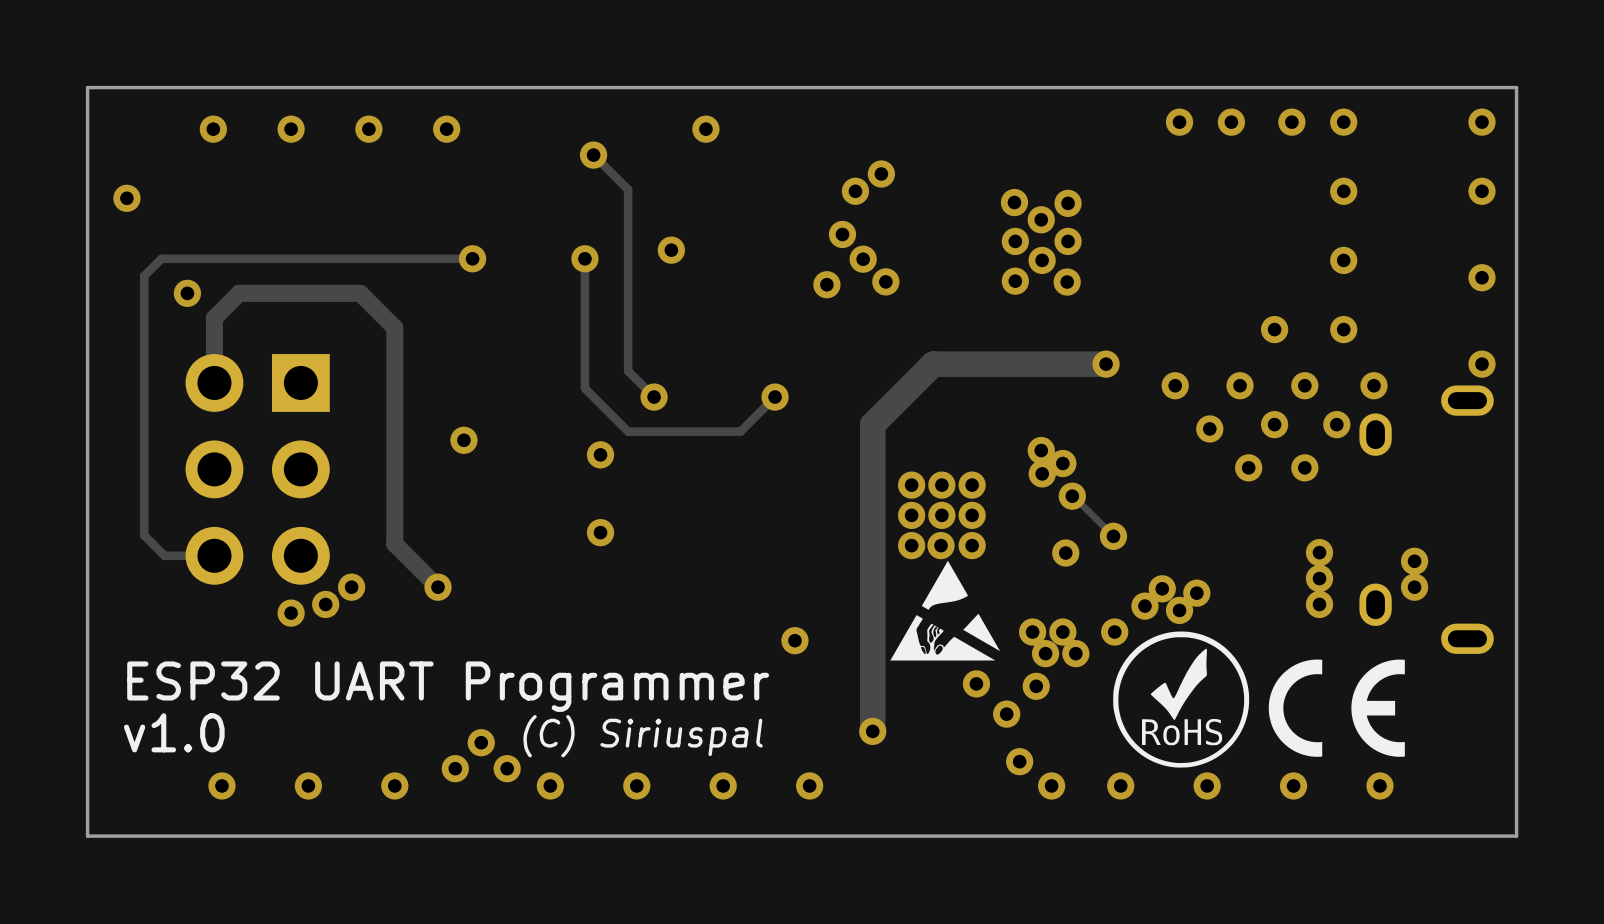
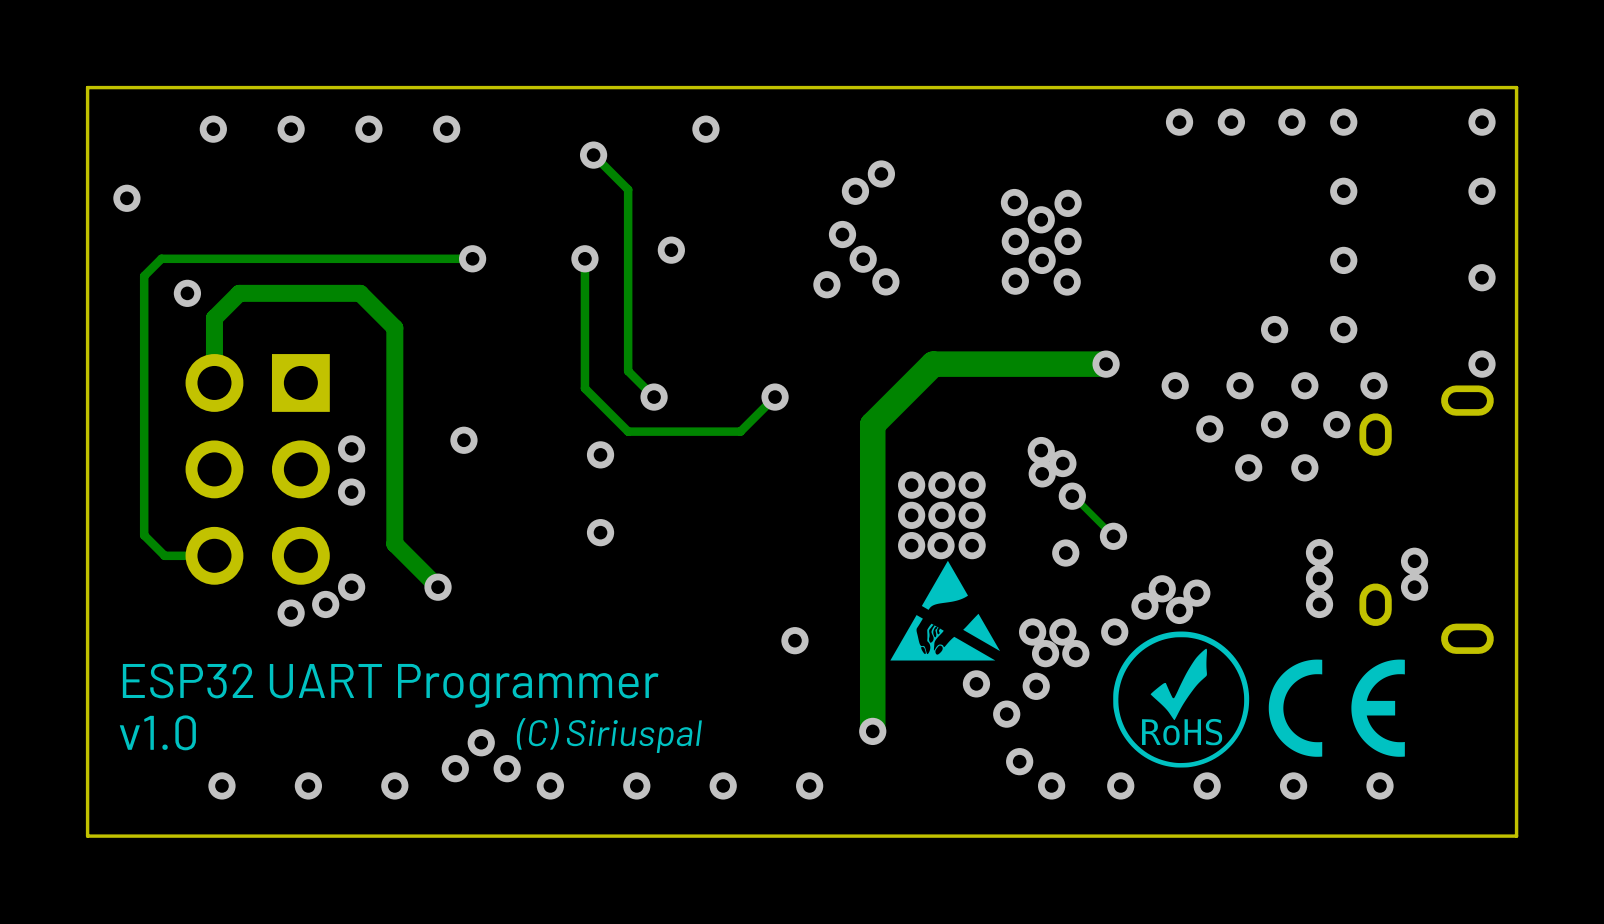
via: none -> (351, 448)
via: none -> (351, 492)

